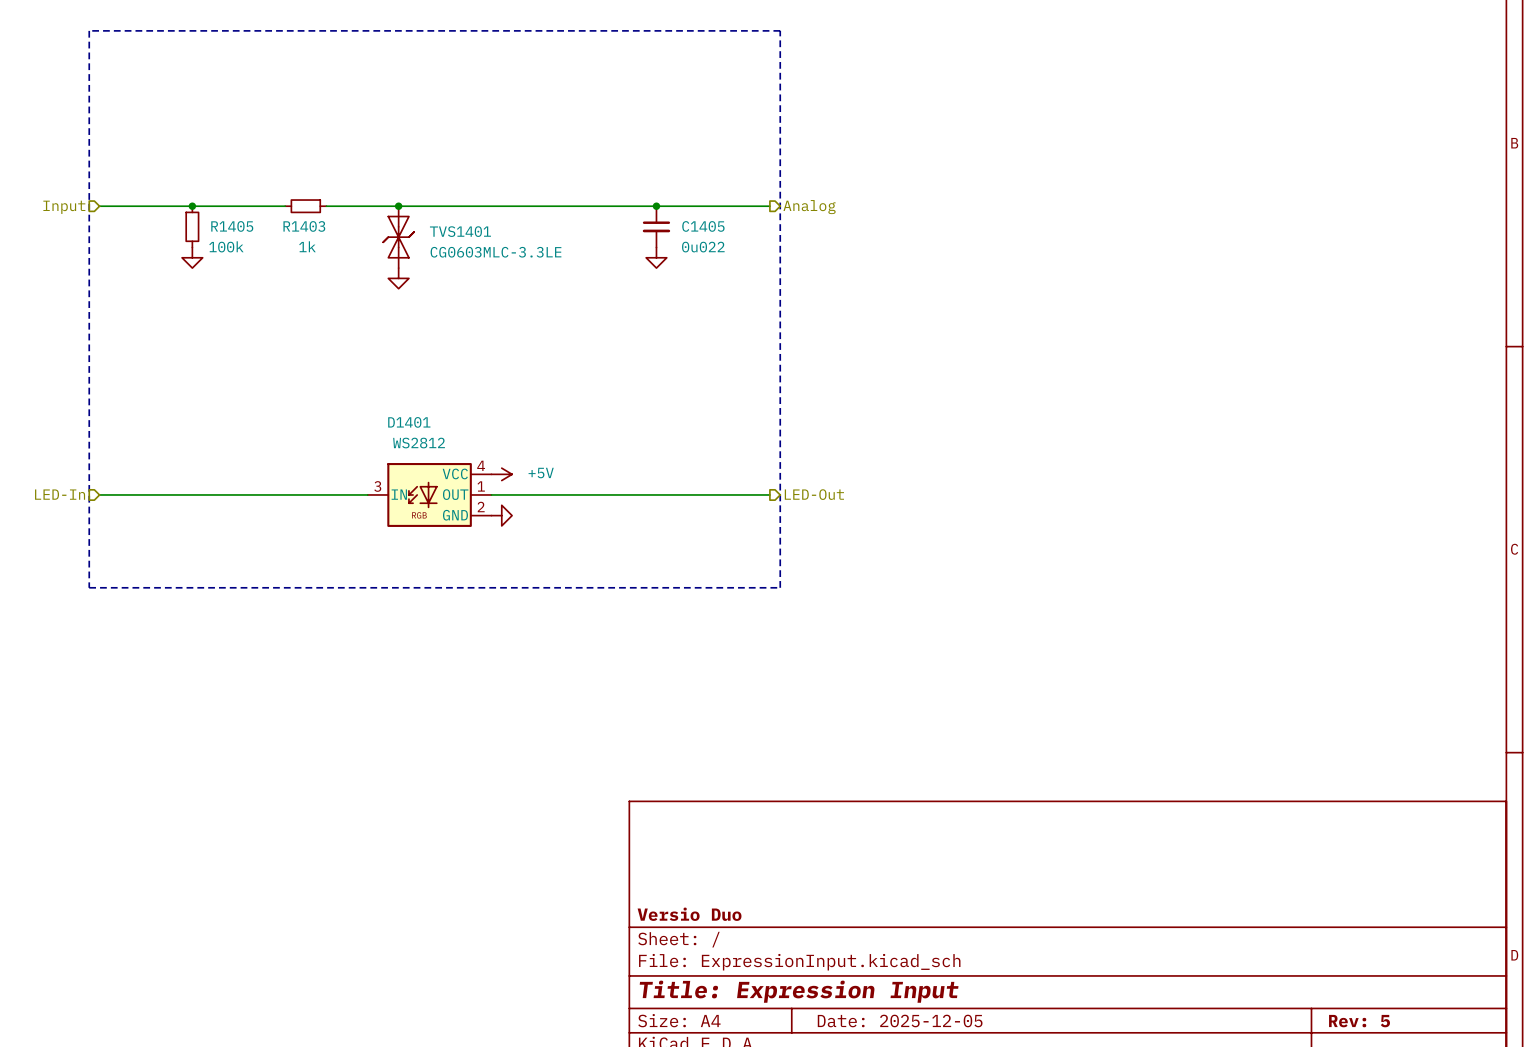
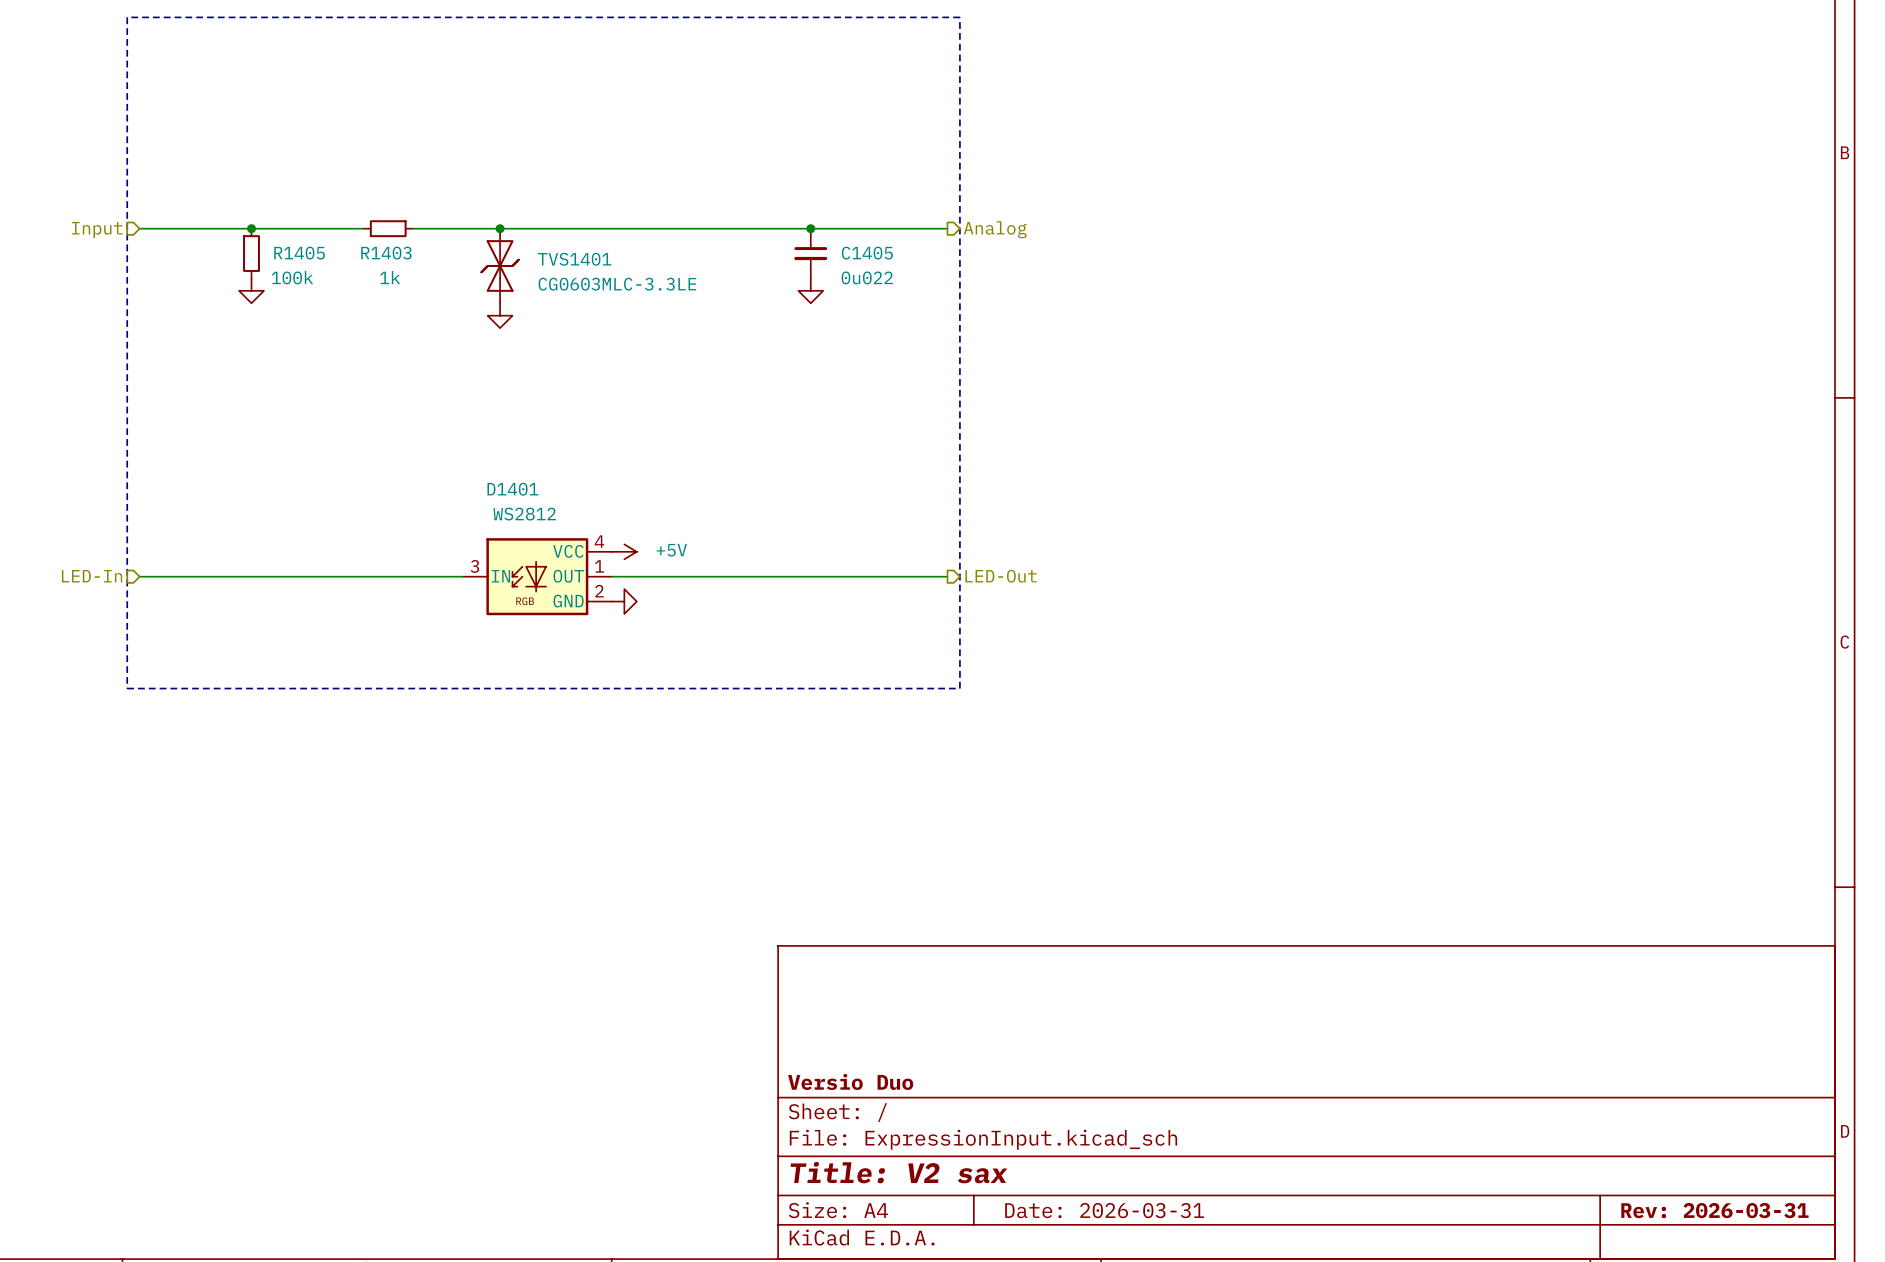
title block: Title: Expression Input (799, 991) -> Title: V2 sax (898, 1172)
title block: Date: 2025-12-05 (900, 1020) -> Date: 2026-03-31 (1104, 1210)
title block: Rev: 5 (1359, 1021) -> Rev: 2026-03-31 (1714, 1210)

